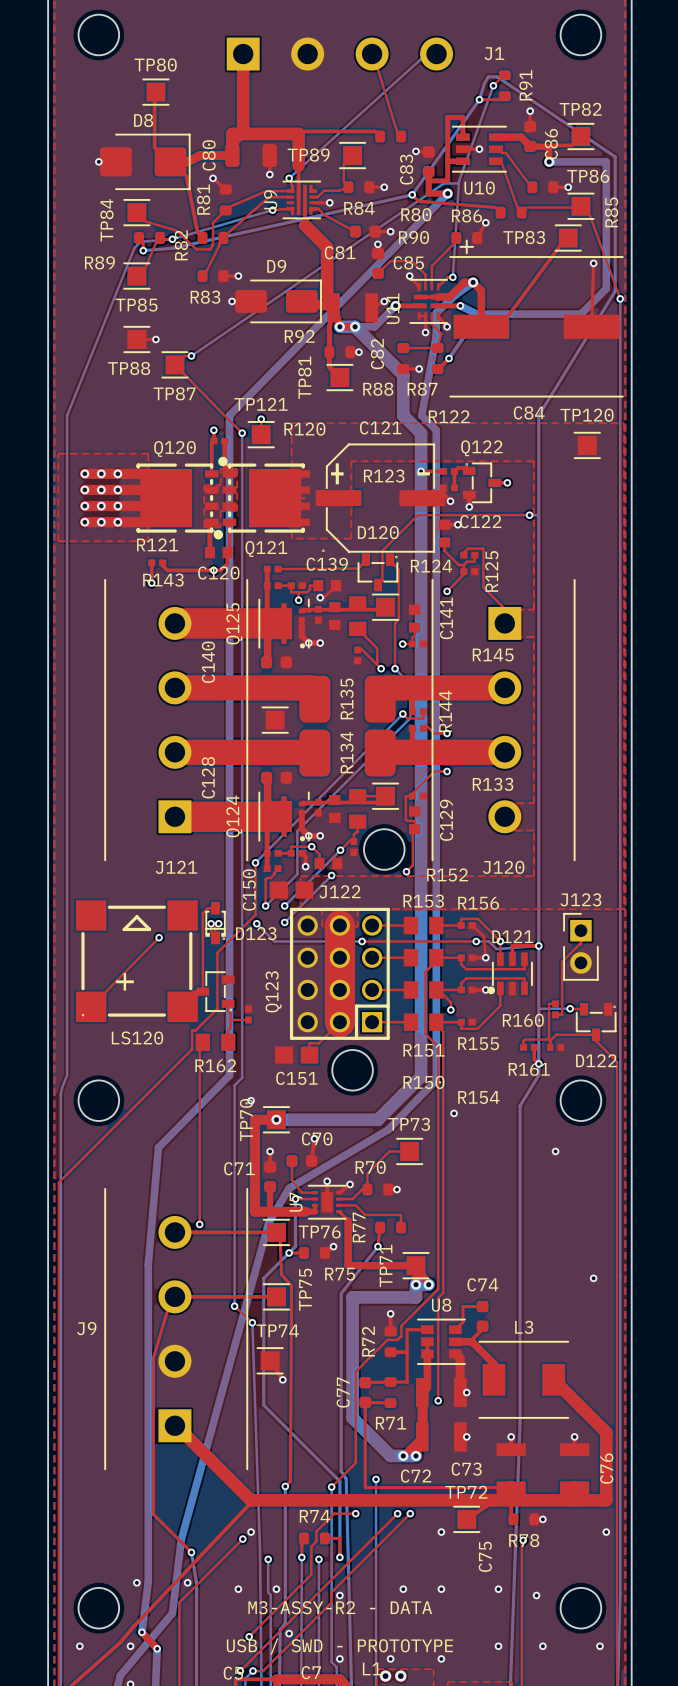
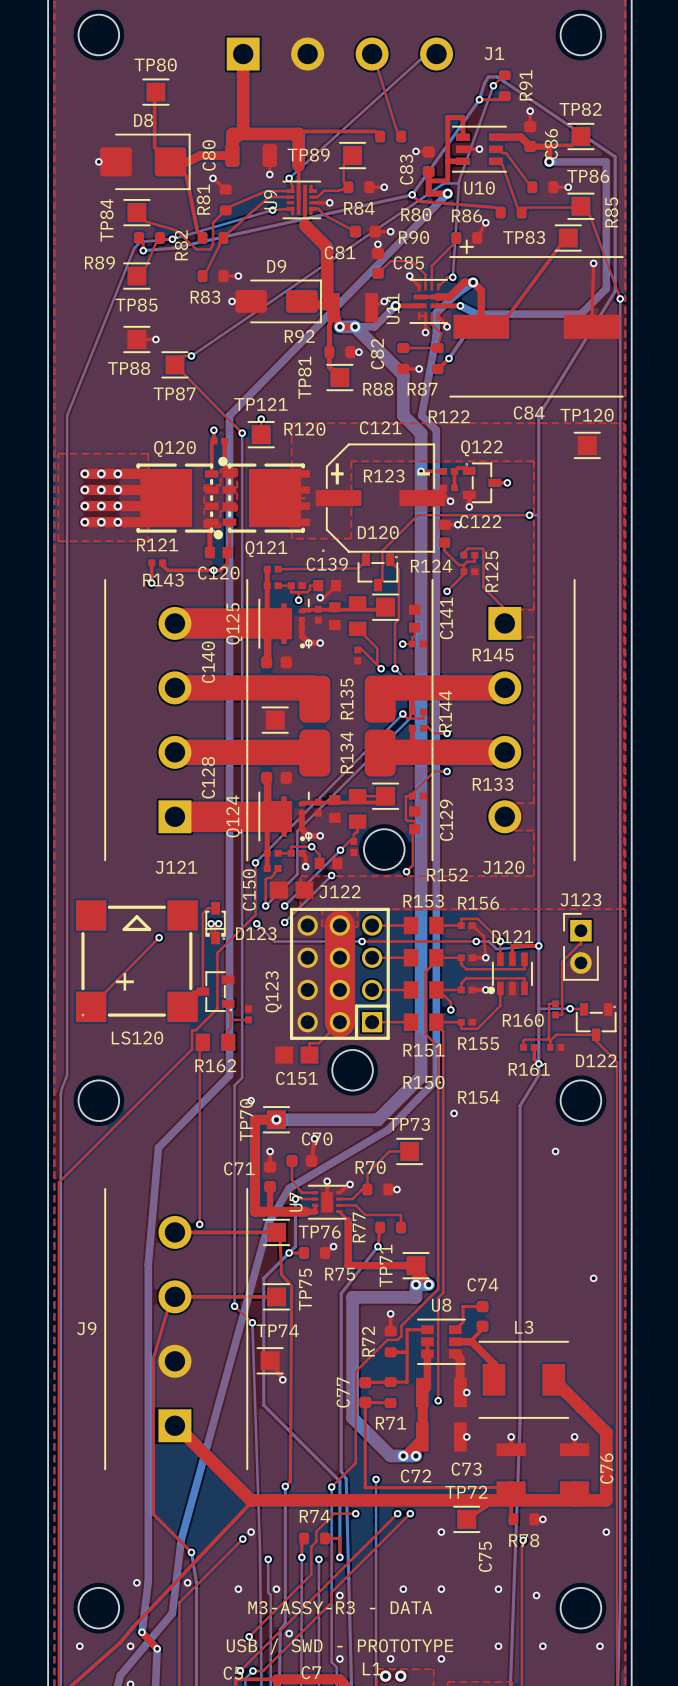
text: M3-ASSY-R2 - DATA (340, 1607) -> M3-ASSY-R3 - DATA (340, 1607)

